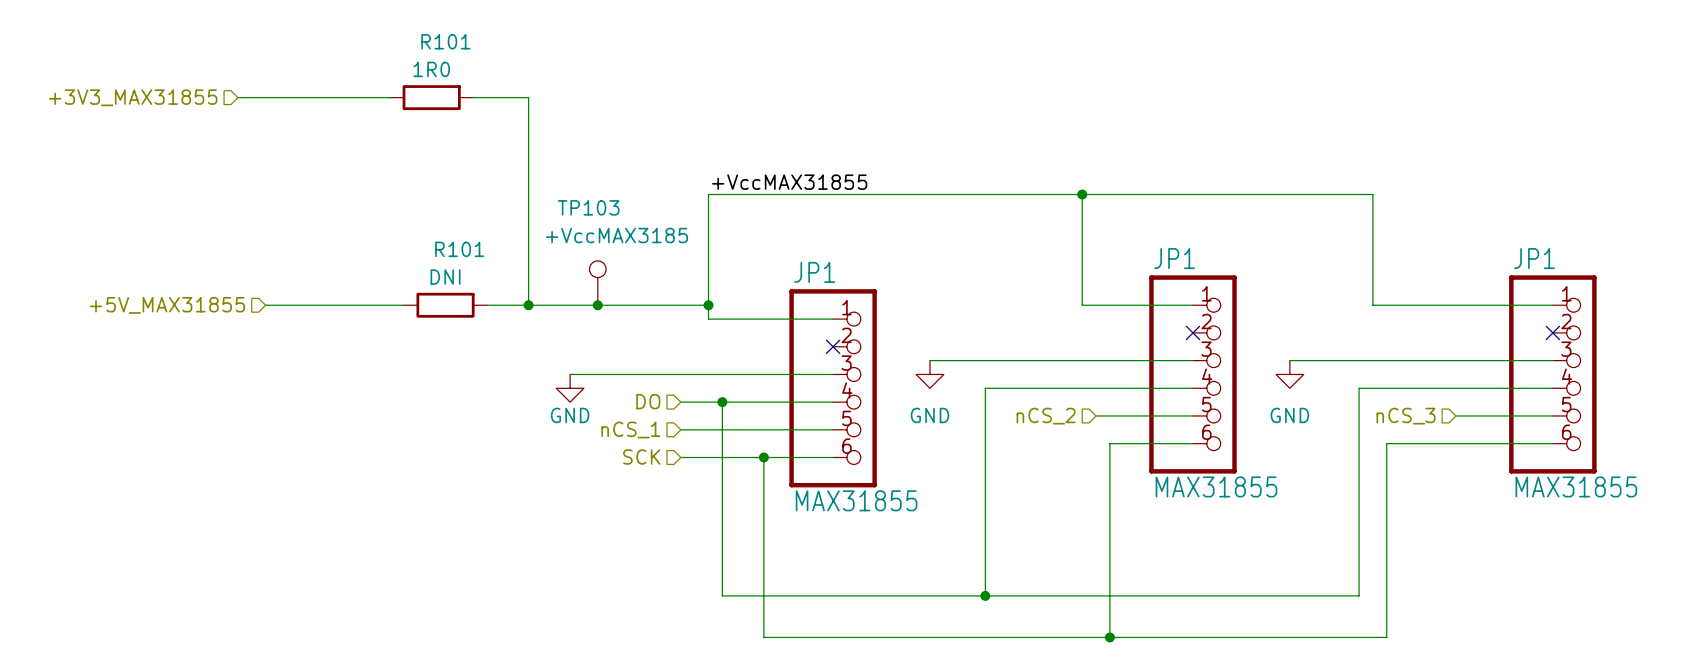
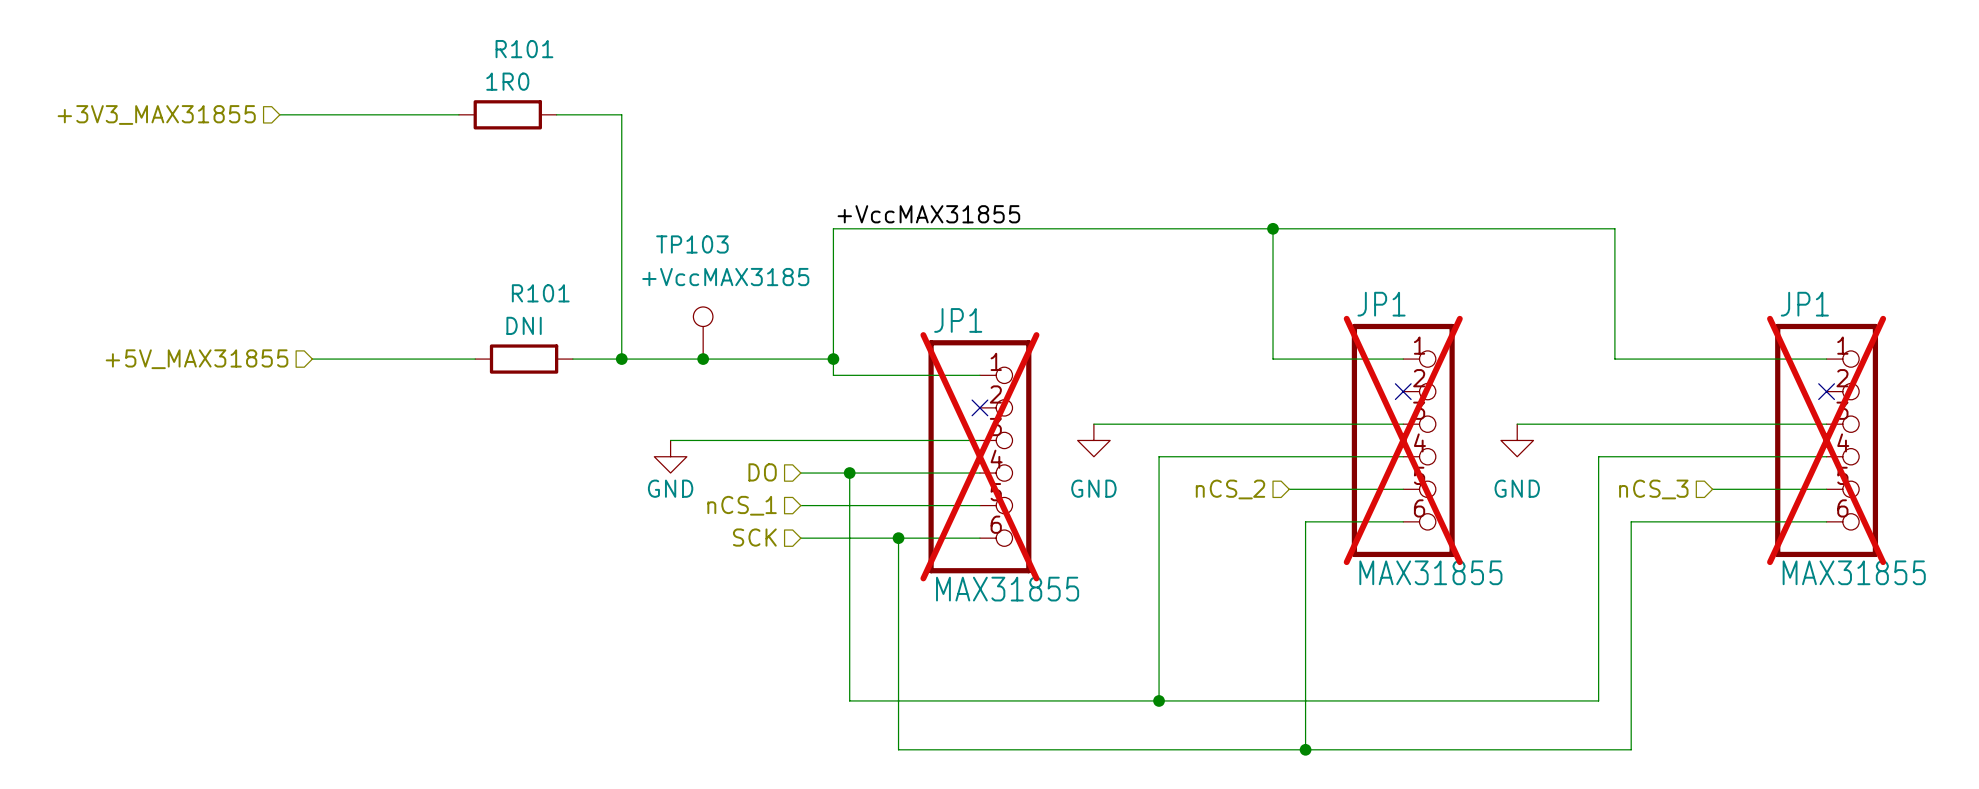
JP1 do-not-place cross: none -> (1403, 440)
JP1 do-not-place cross: none -> (1826, 440)
JP1 do-not-place cross: none -> (979, 456)

